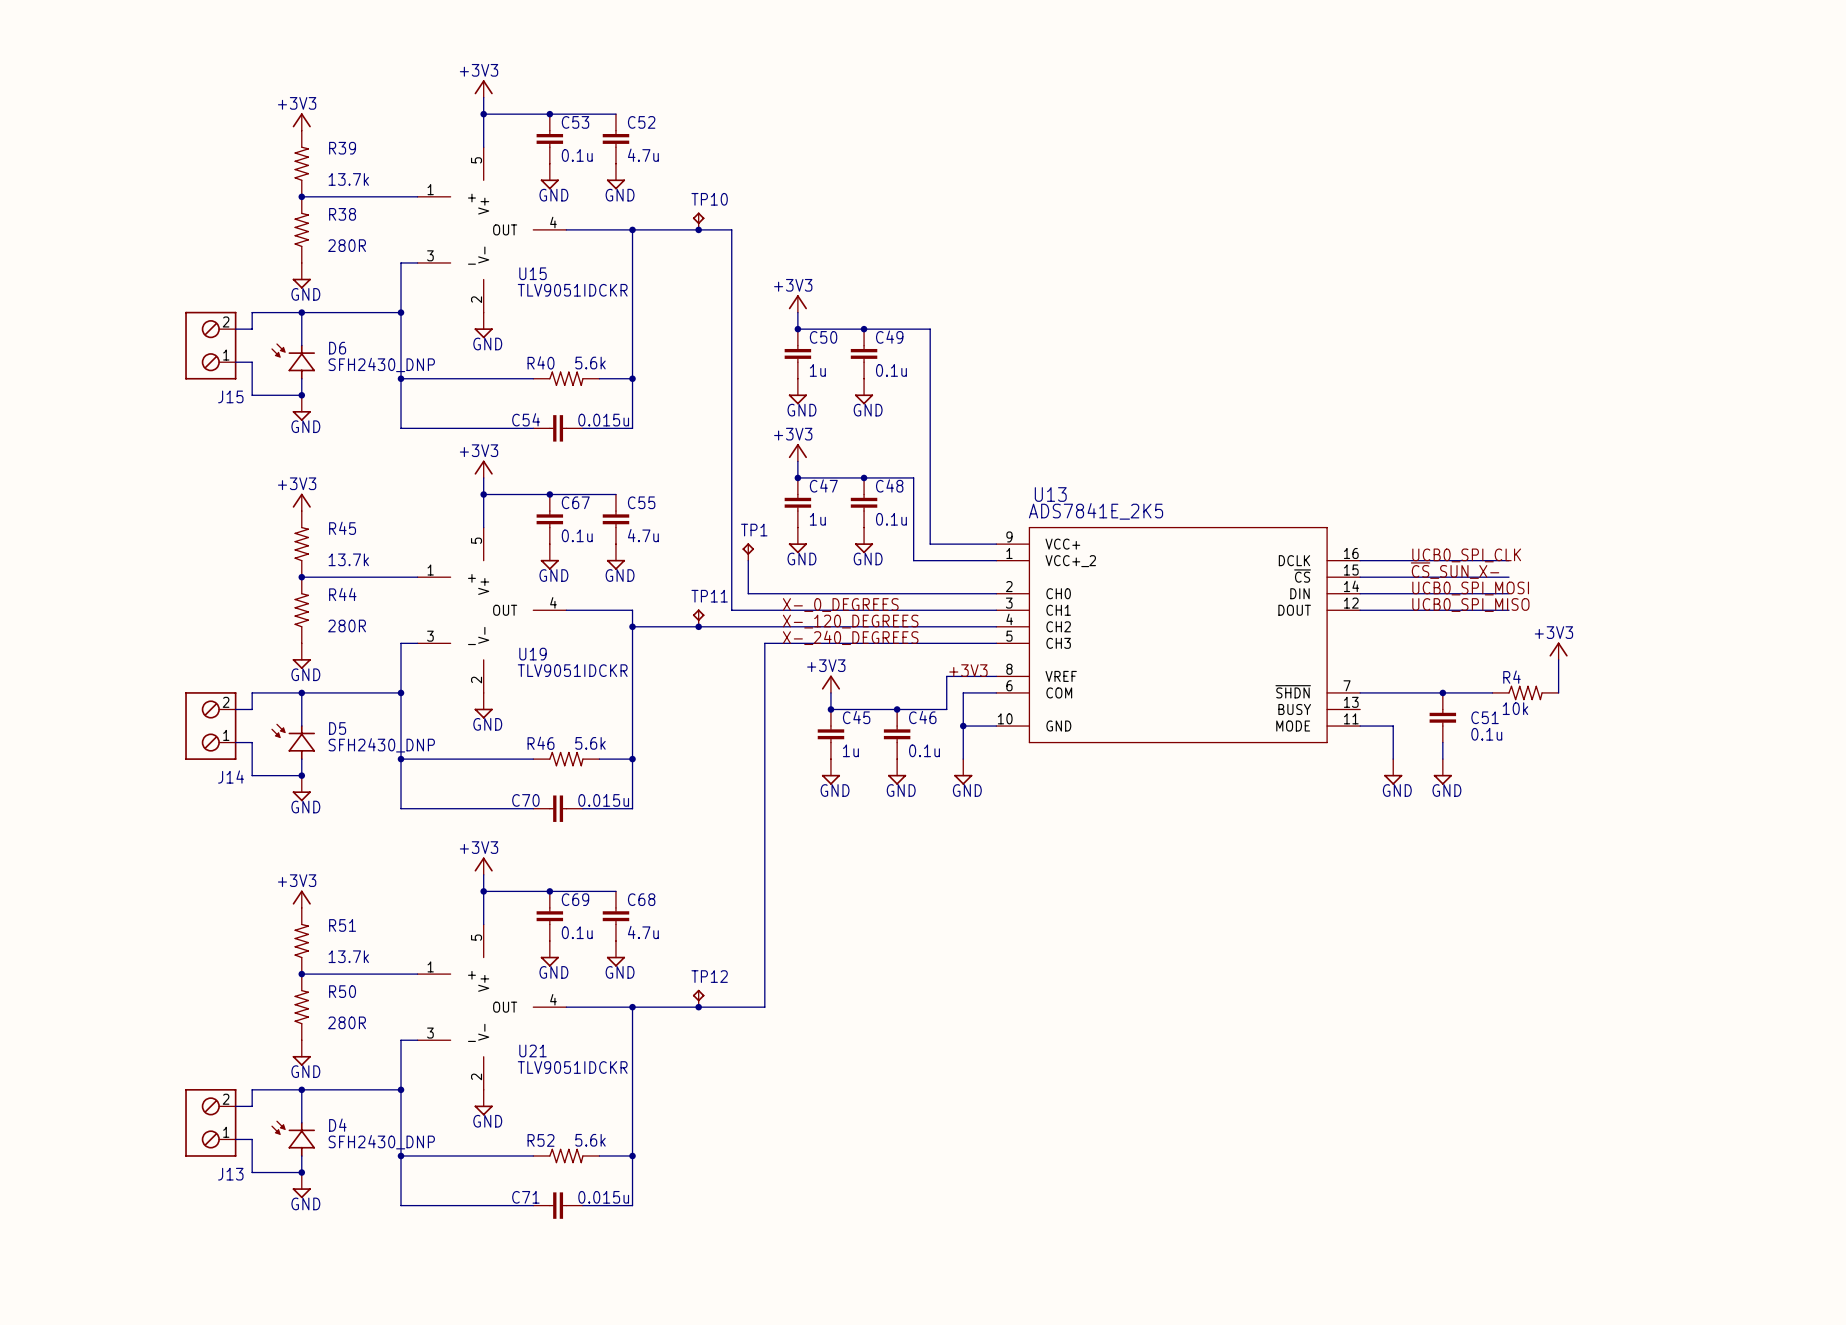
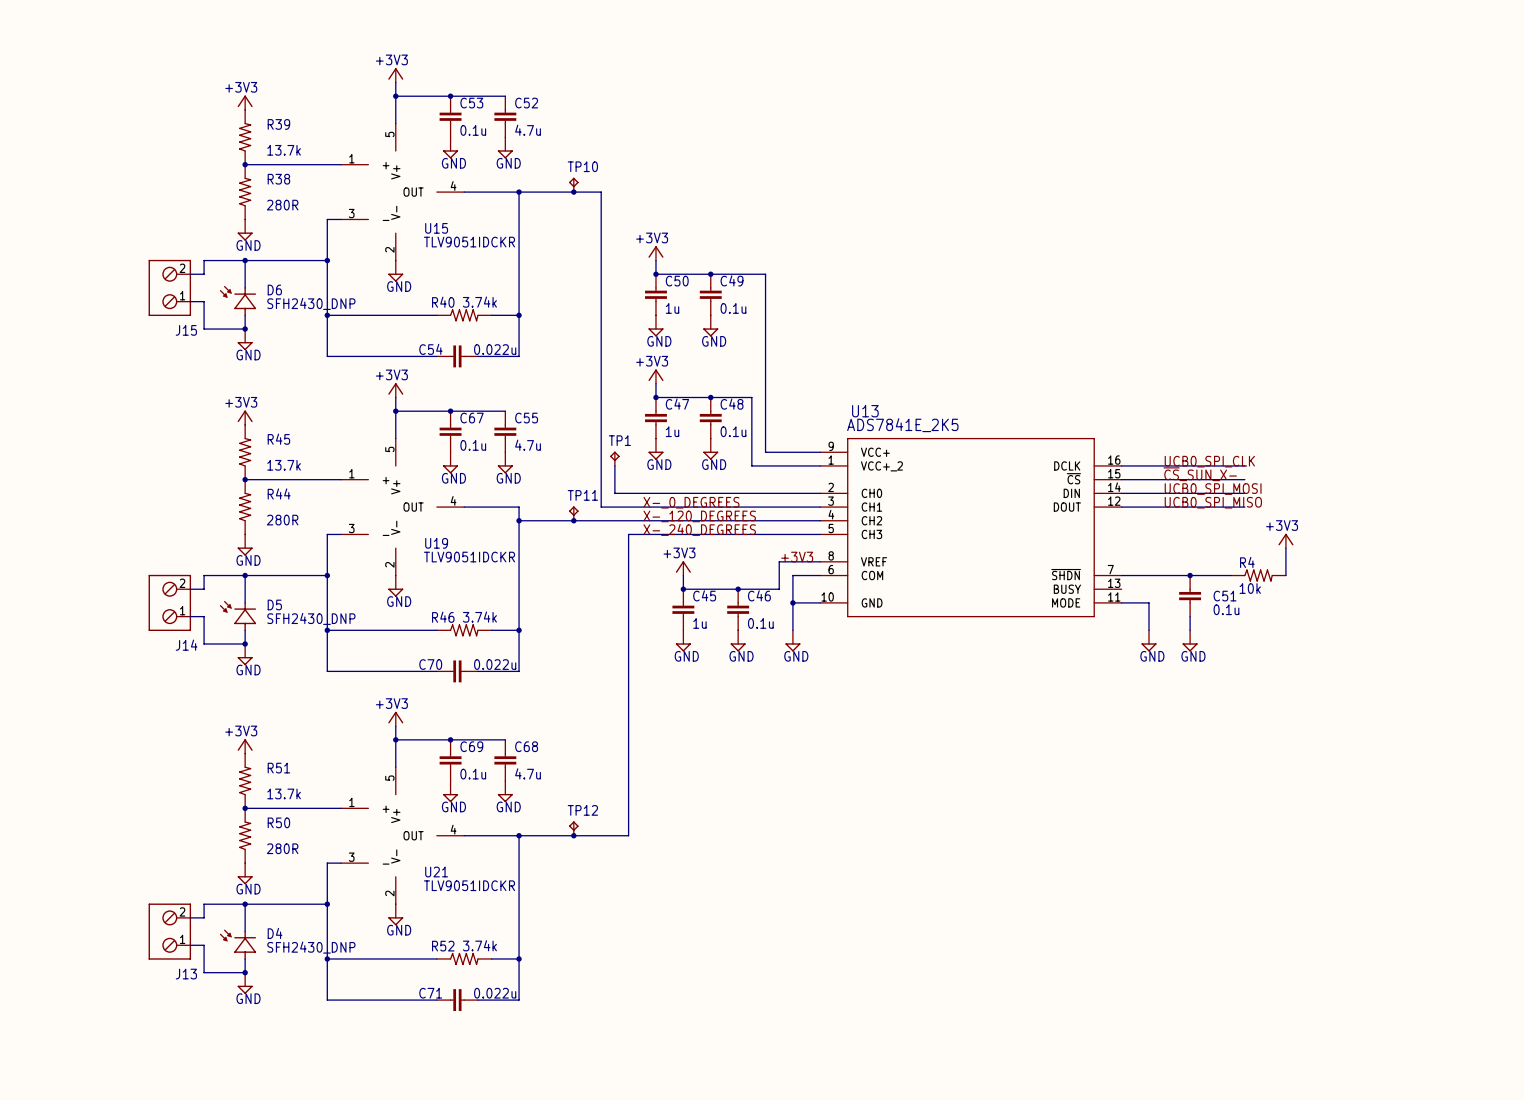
R40 value: 5.6k (590, 363) -> 3.74k (479, 302)
C54 value: 0.015u (603, 420) -> 0.022u (495, 349)
R46 value: 5.6k (590, 743) -> 3.74k (479, 617)
C70 value: 0.015u (603, 800) -> 0.022u (495, 664)
R52 value: 5.6k (590, 1140) -> 3.74k (479, 945)
C71 value: 0.015u (603, 1197) -> 0.022u (495, 993)

